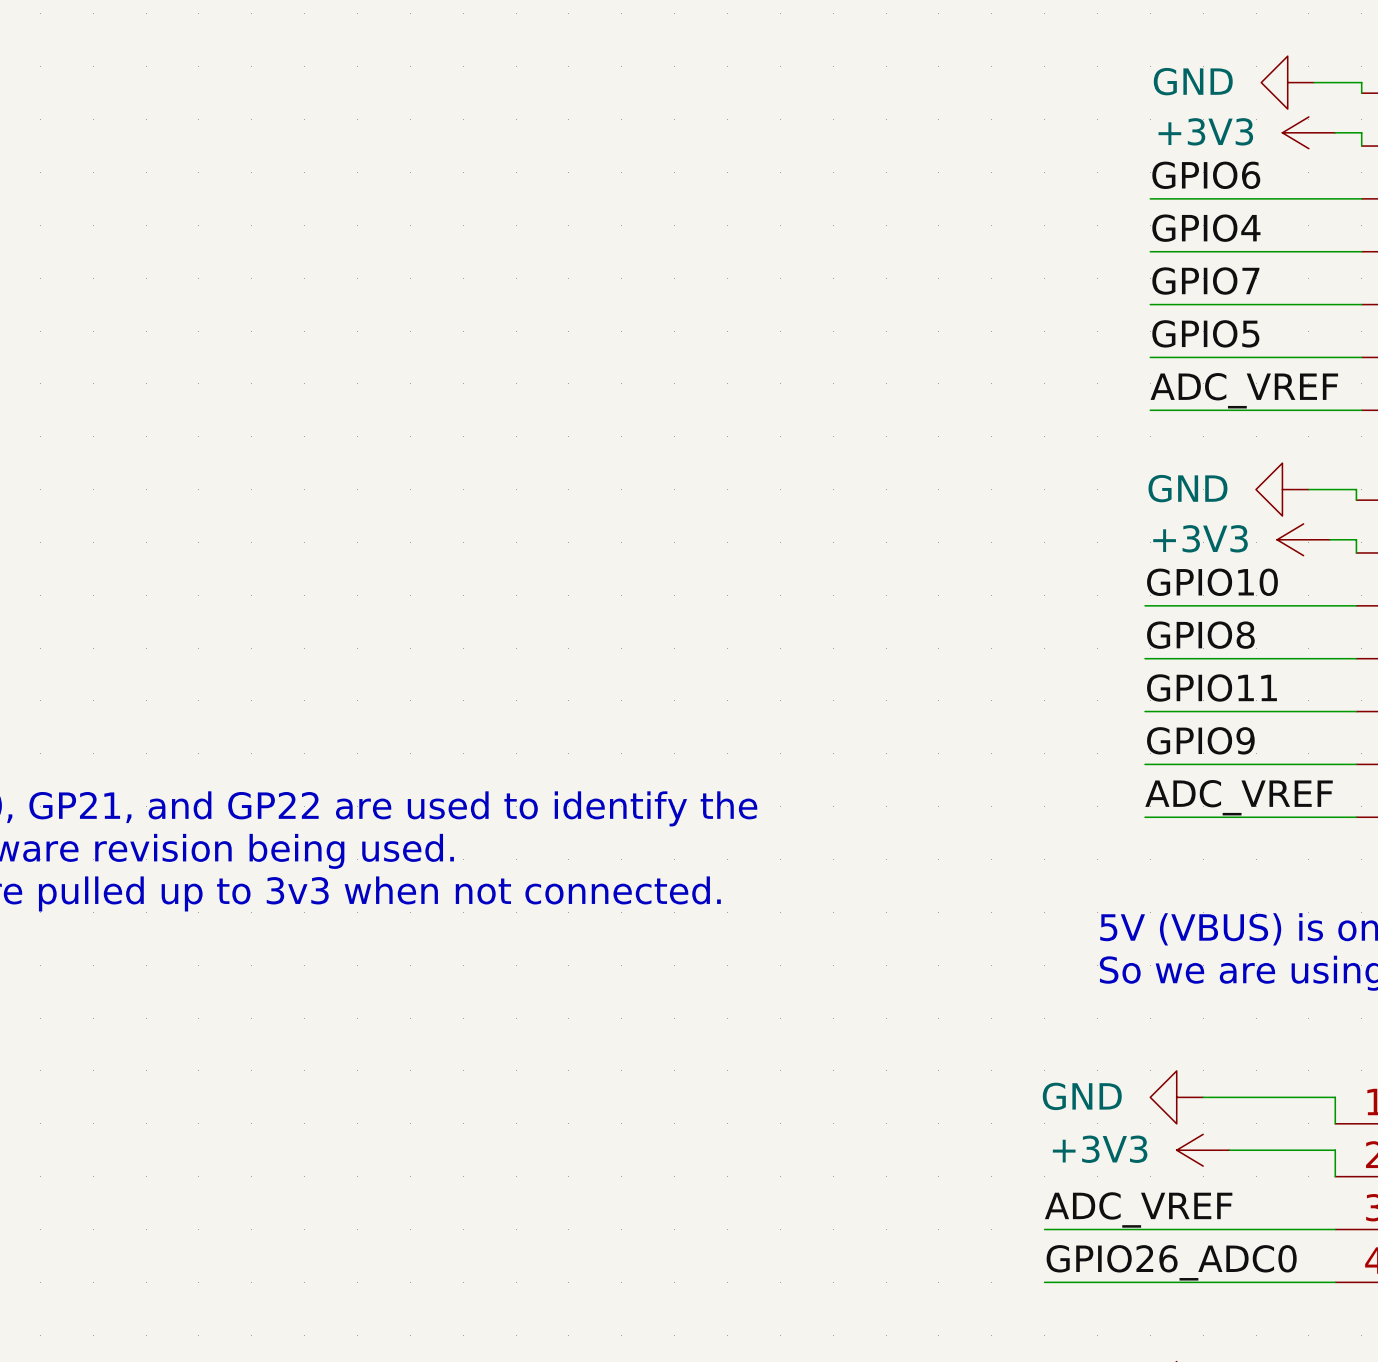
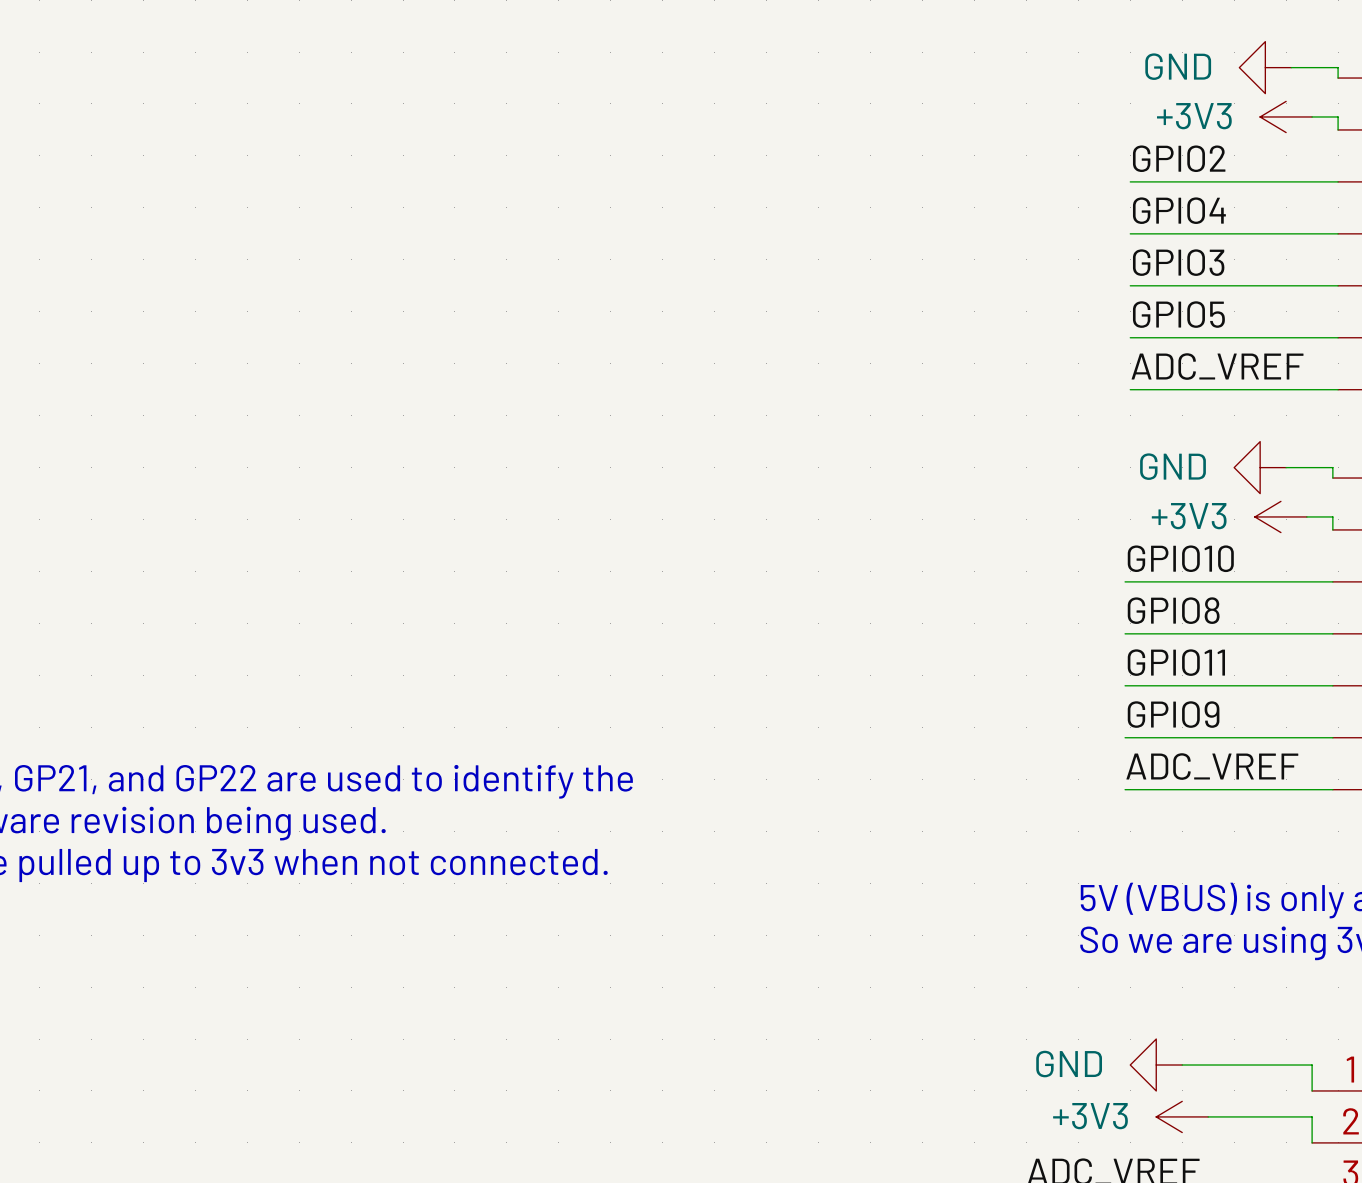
label: GPIO6 (1206, 175) -> GPIO2 (1179, 158)
label: GPIO7 (1205, 281) -> GPIO3 (1178, 262)

